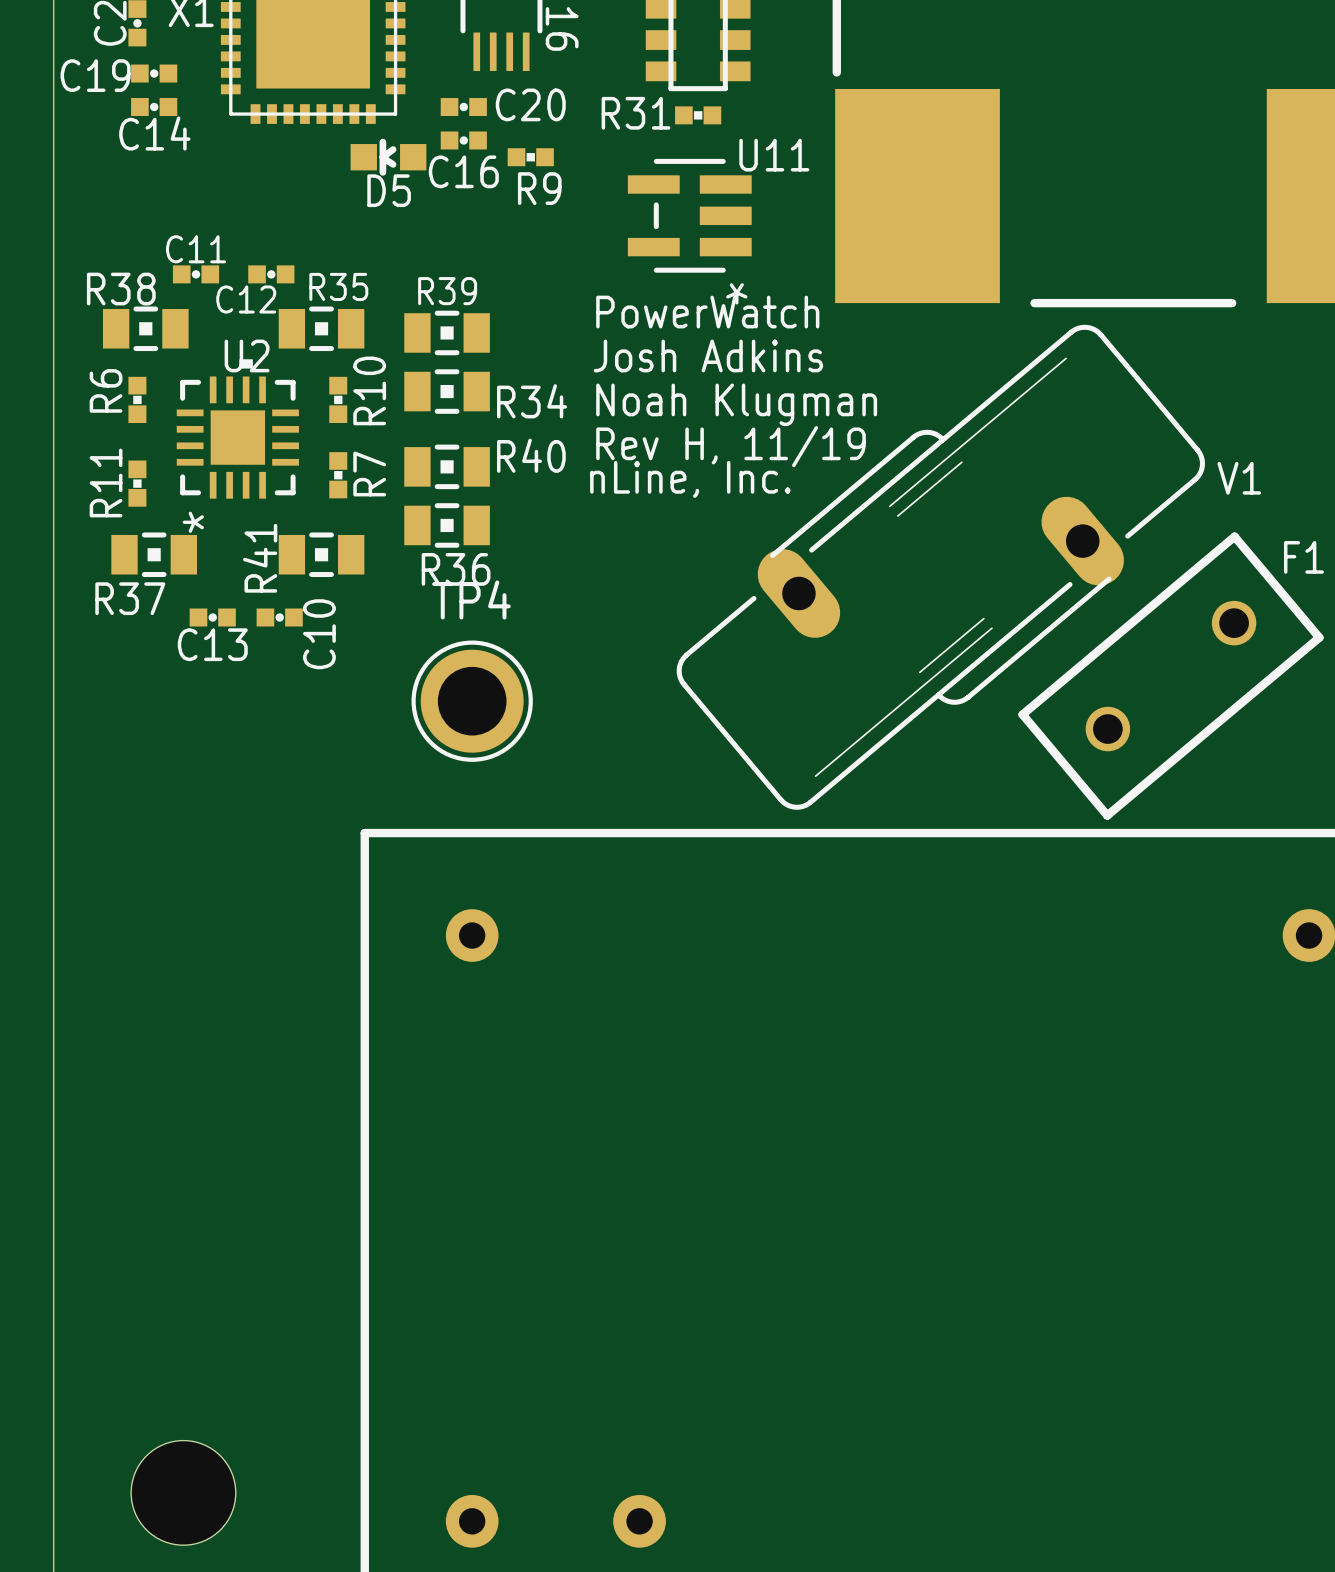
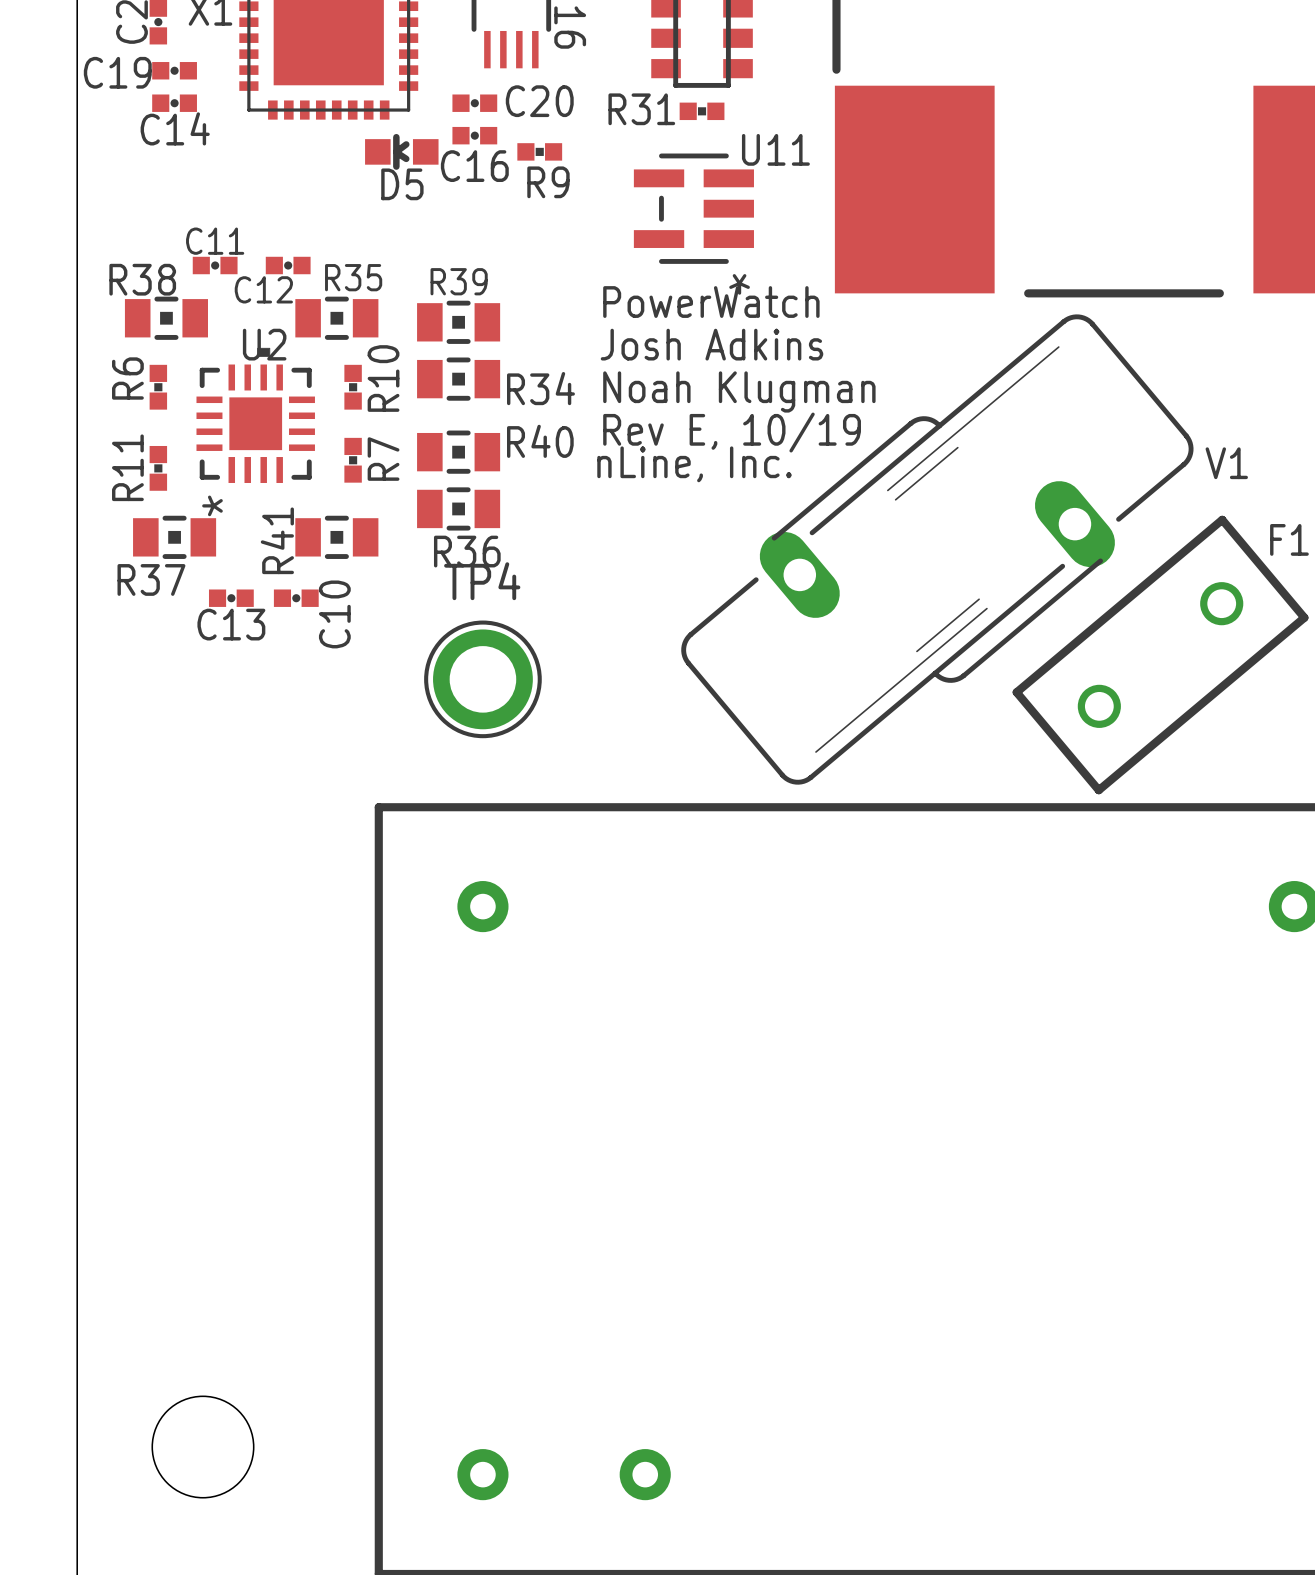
text: Rev H, 11/19 (731, 446) -> Rev E, 10/19 (732, 432)

